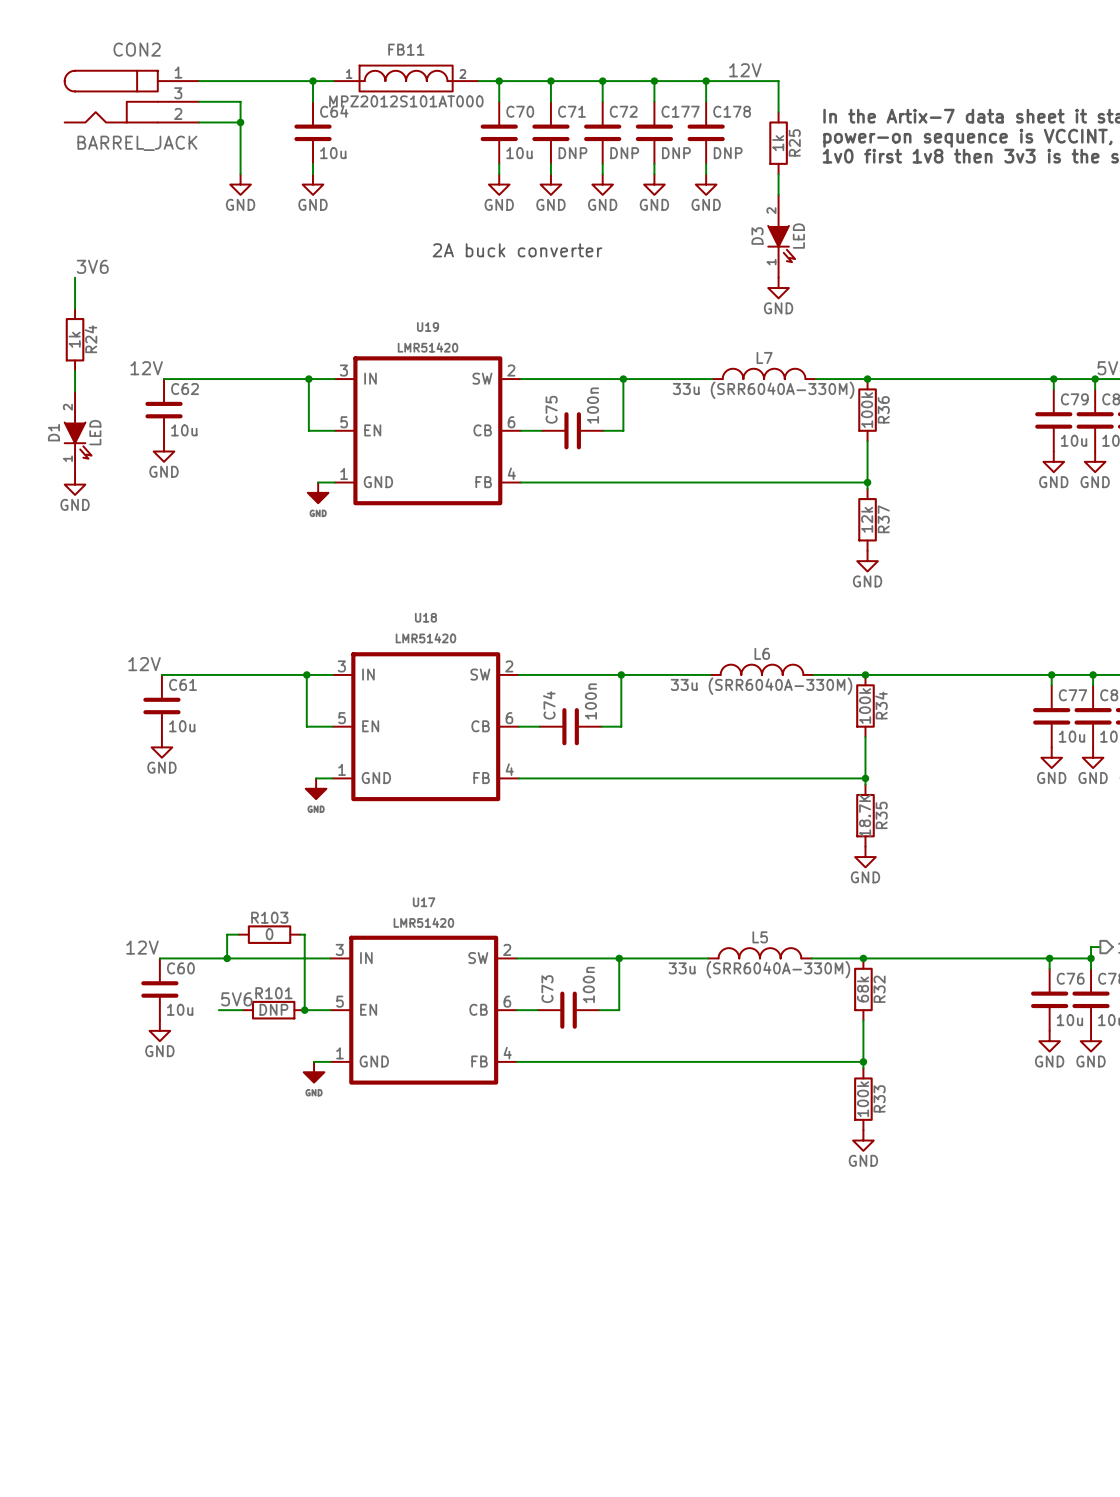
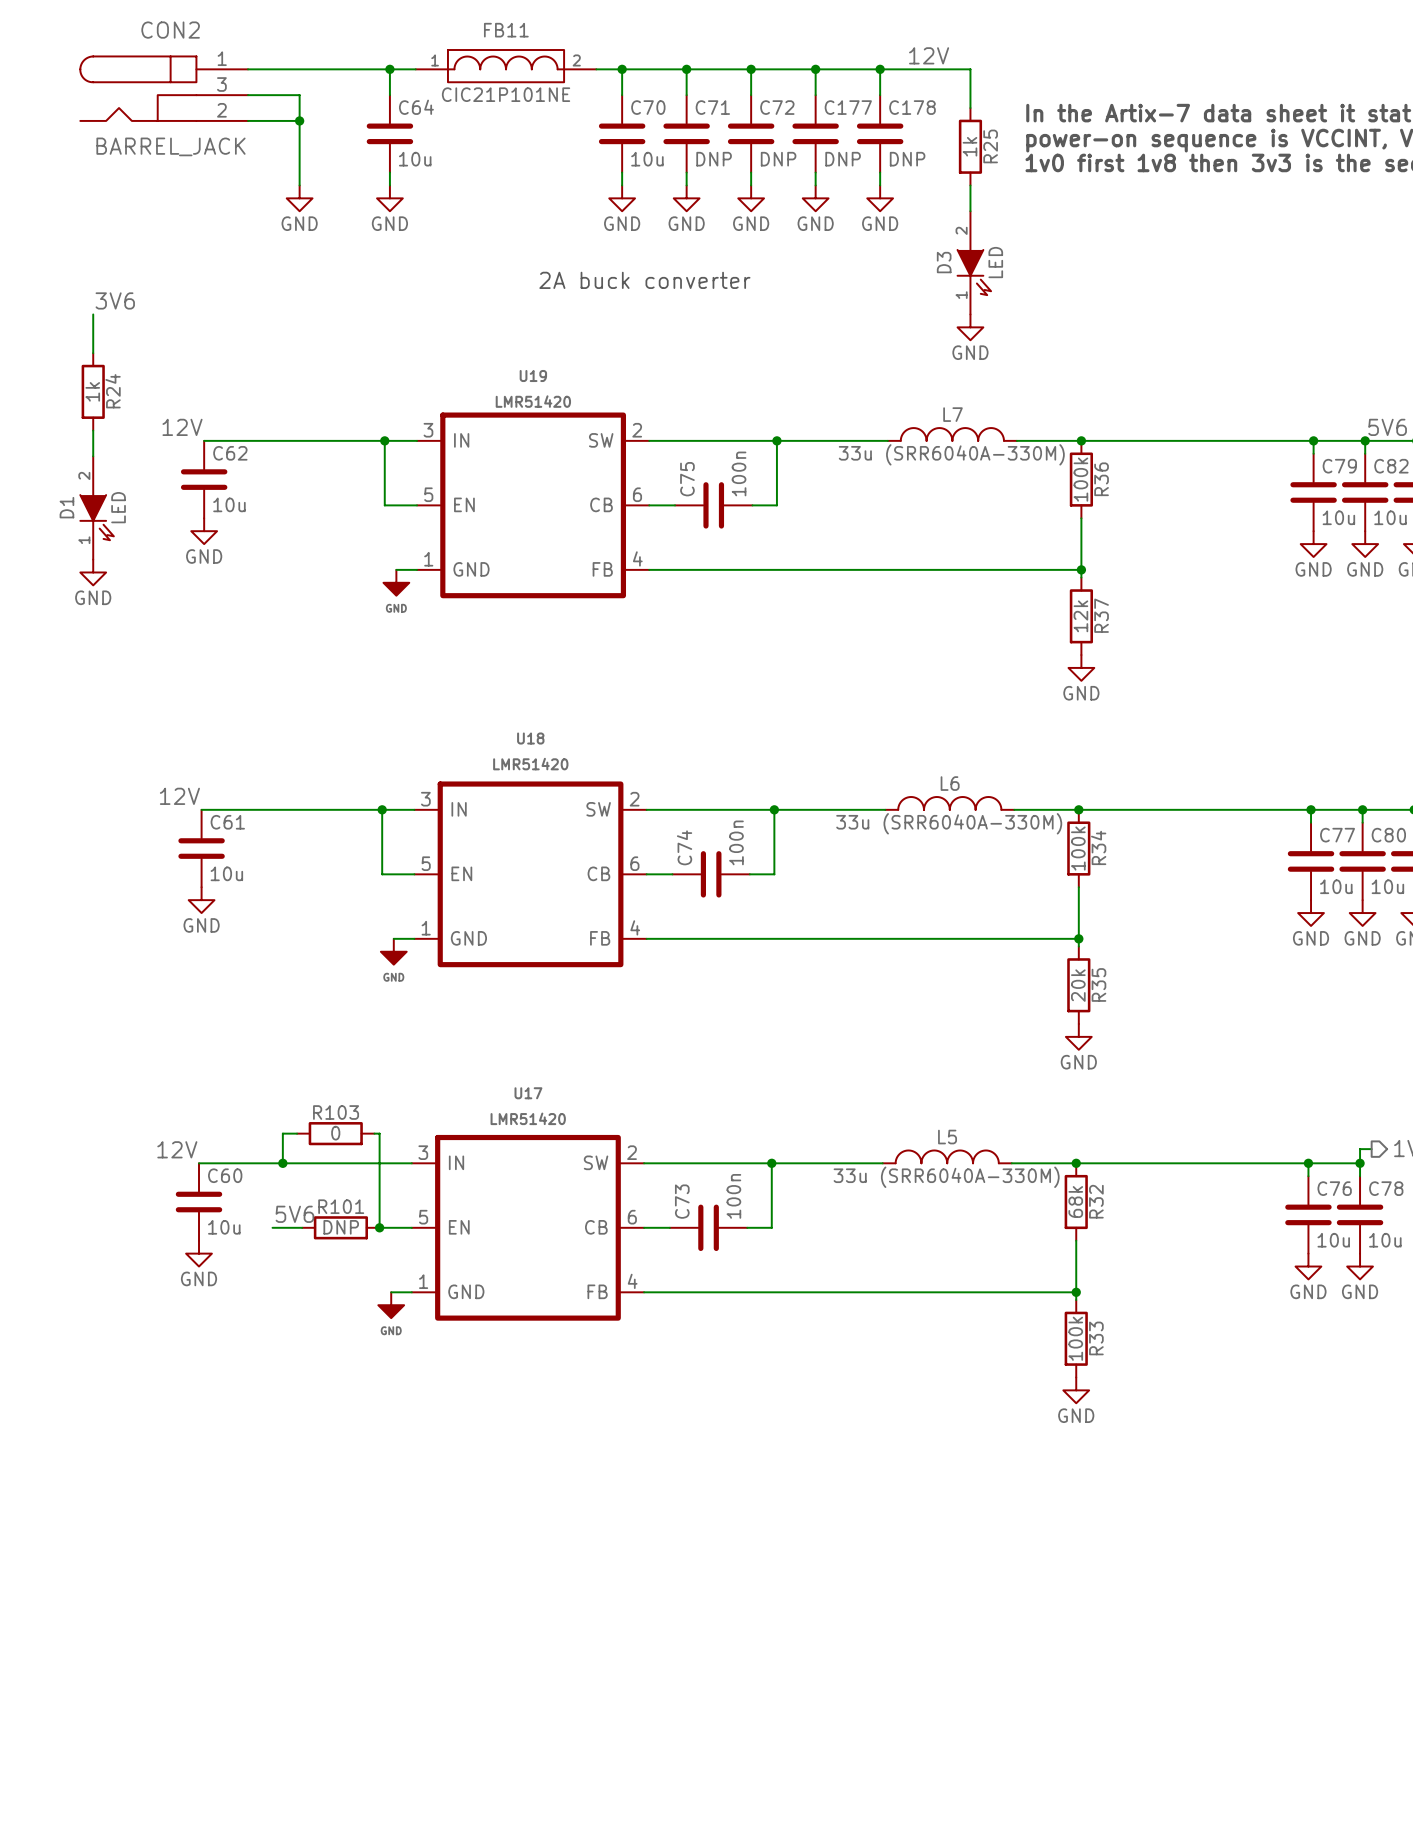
FB11 value: MPZ2012S101AT000 (406, 101) -> CIC21P101NE (506, 94)
R35 value: 18.7K (865, 815) -> 20k (1078, 985)

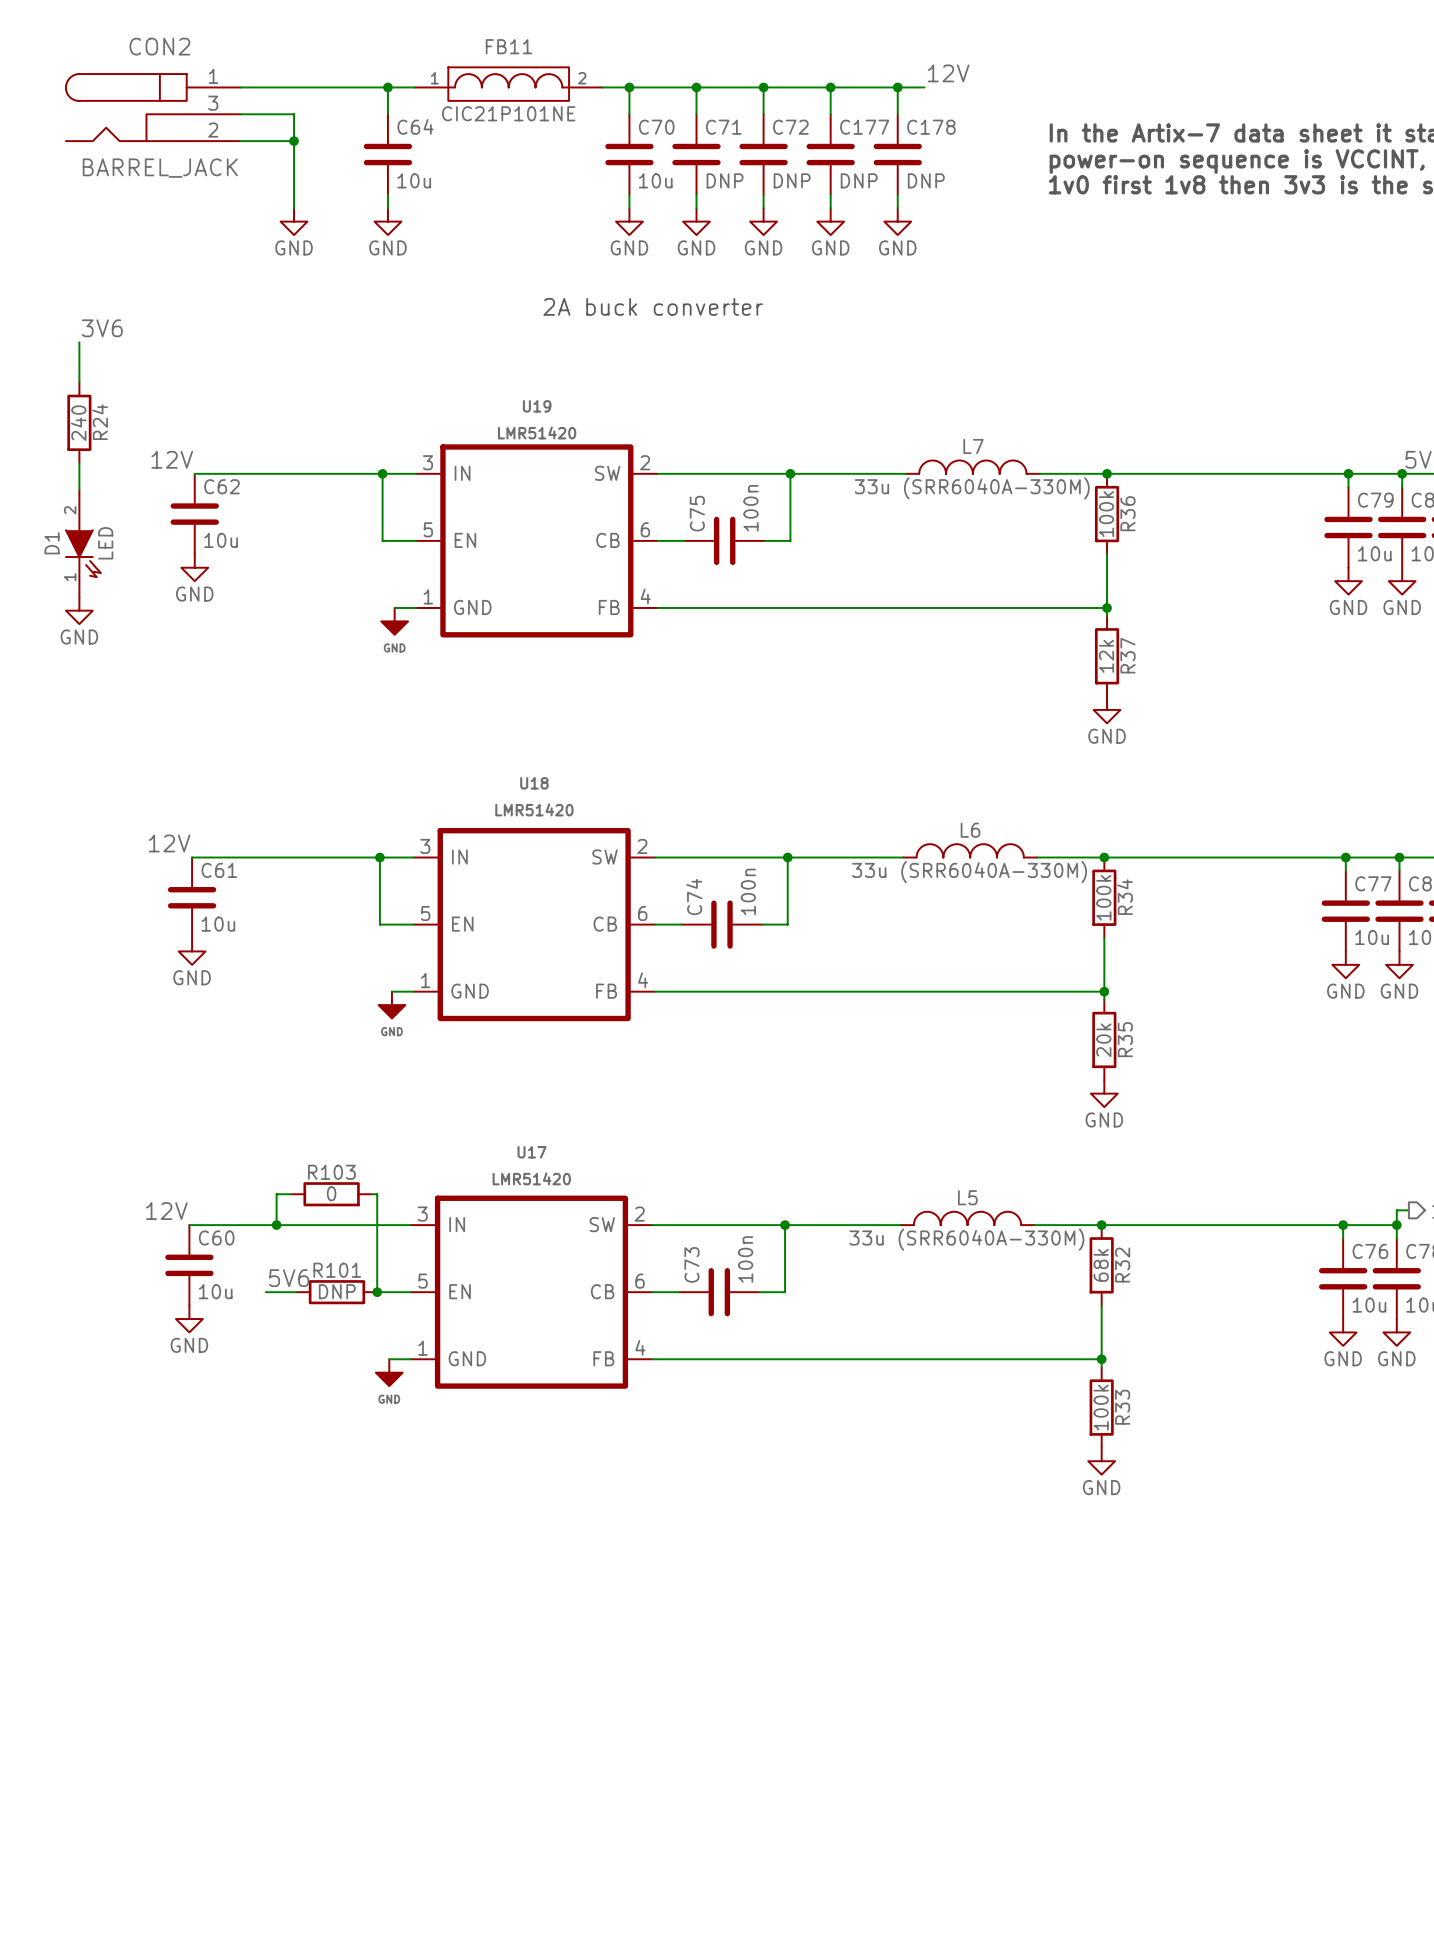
wire: (905, 69) (970, 69) (970, 108) -> none
R25: 1k (970, 146) -> none
wire: (970, 185) (970, 211) -> none
D3: LED (974, 262) -> none
power symbol: GND (970, 327) -> none
R24 value: 1k (92, 391) -> 240 (78, 423)

